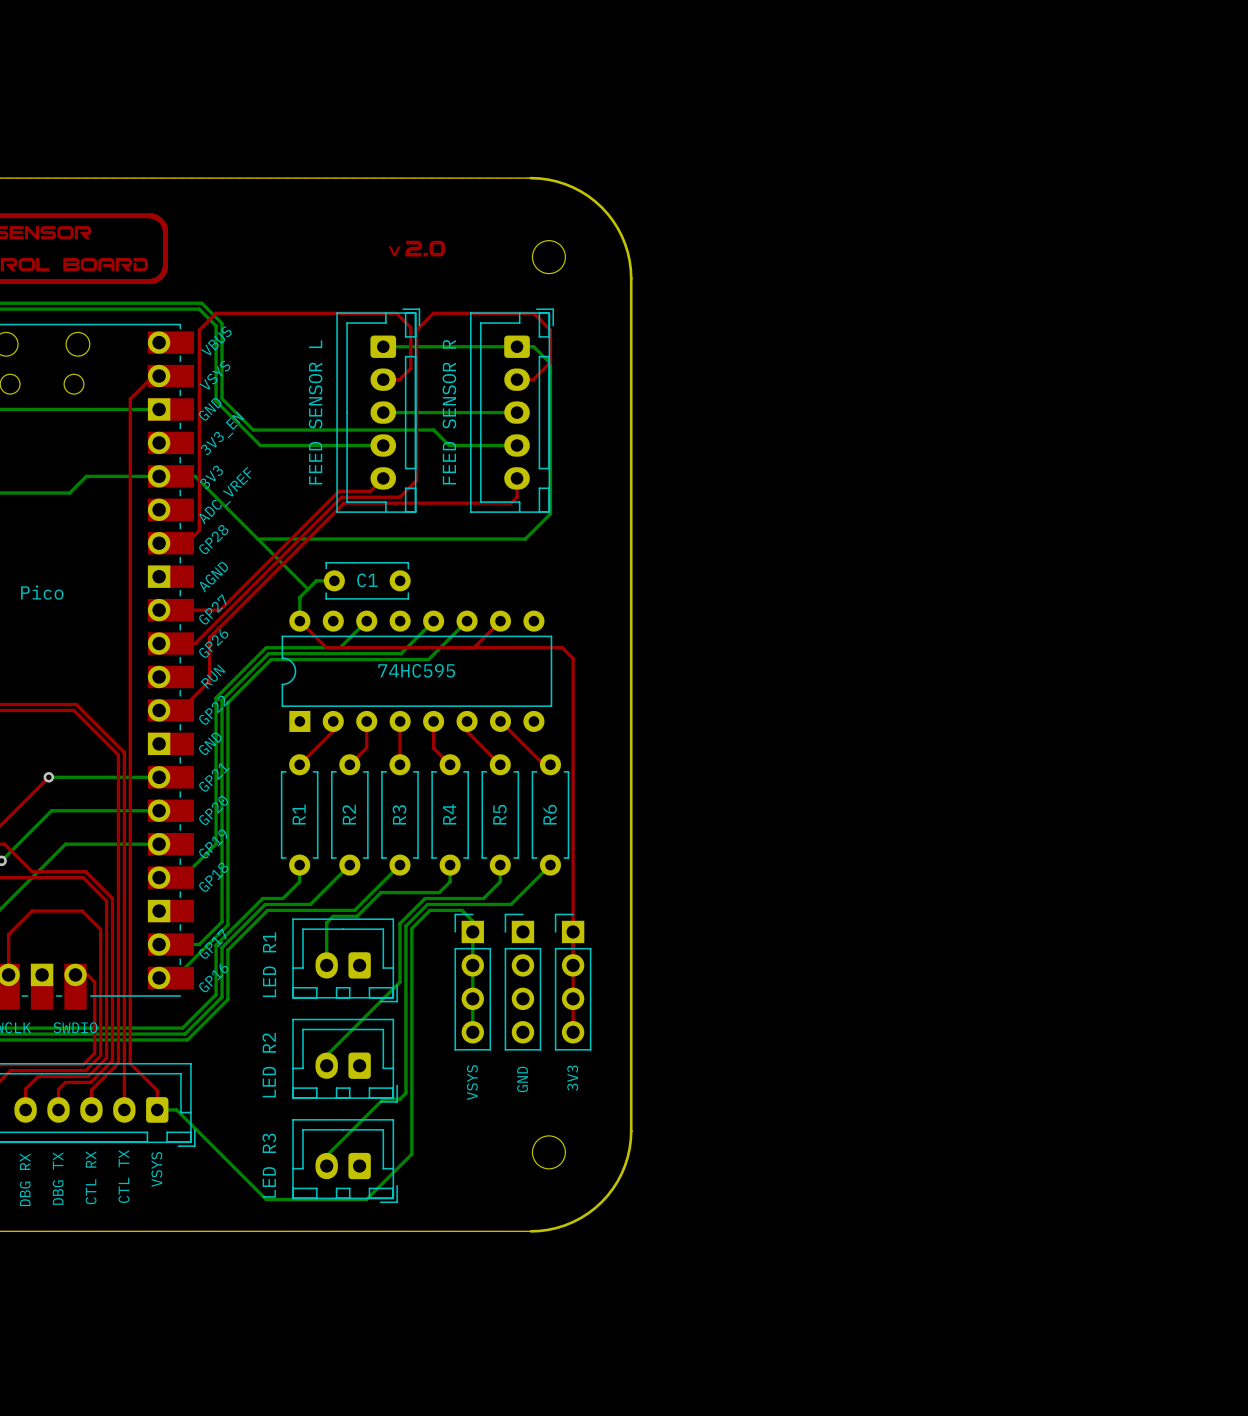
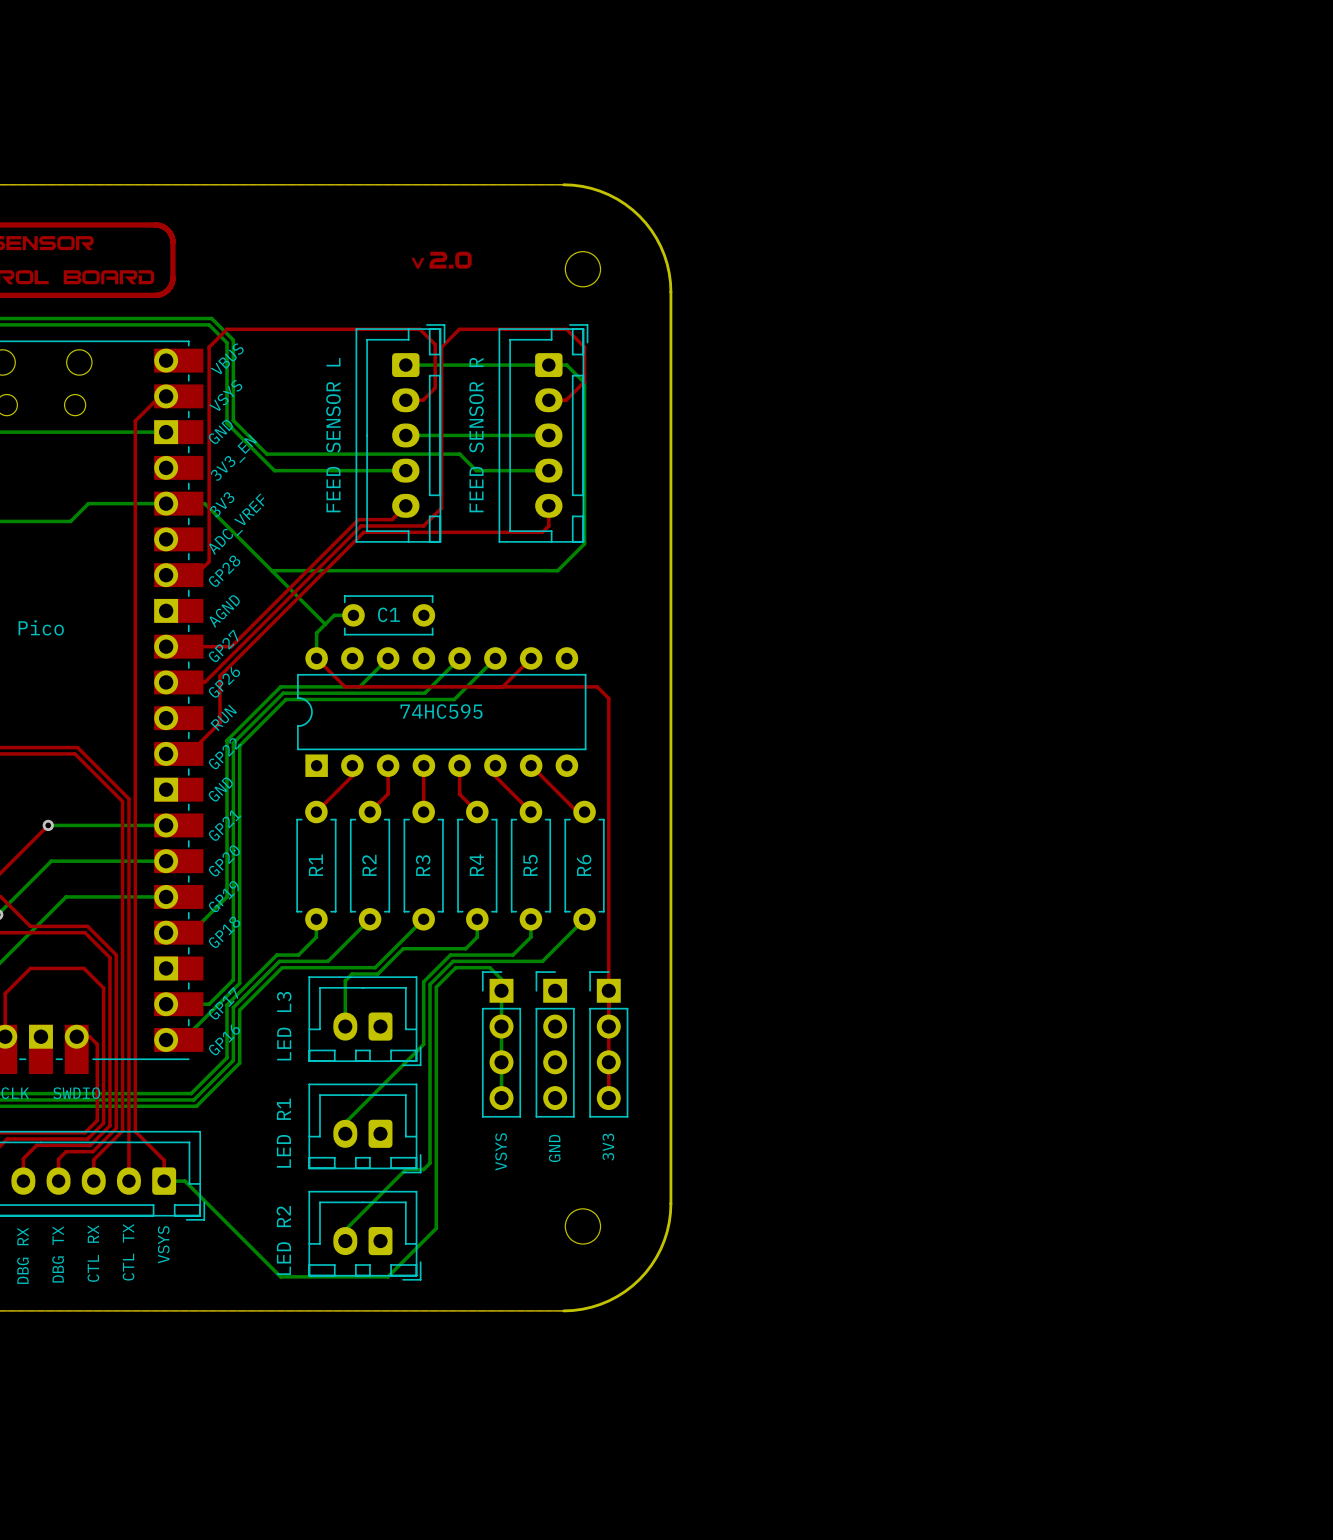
part value: LED R1 (269, 964) -> LED L3 (284, 1026)
part value: LED R2 (269, 1065) -> LED R1 (283, 1133)
part value: LED R3 (269, 1165) -> LED R2 (283, 1240)

